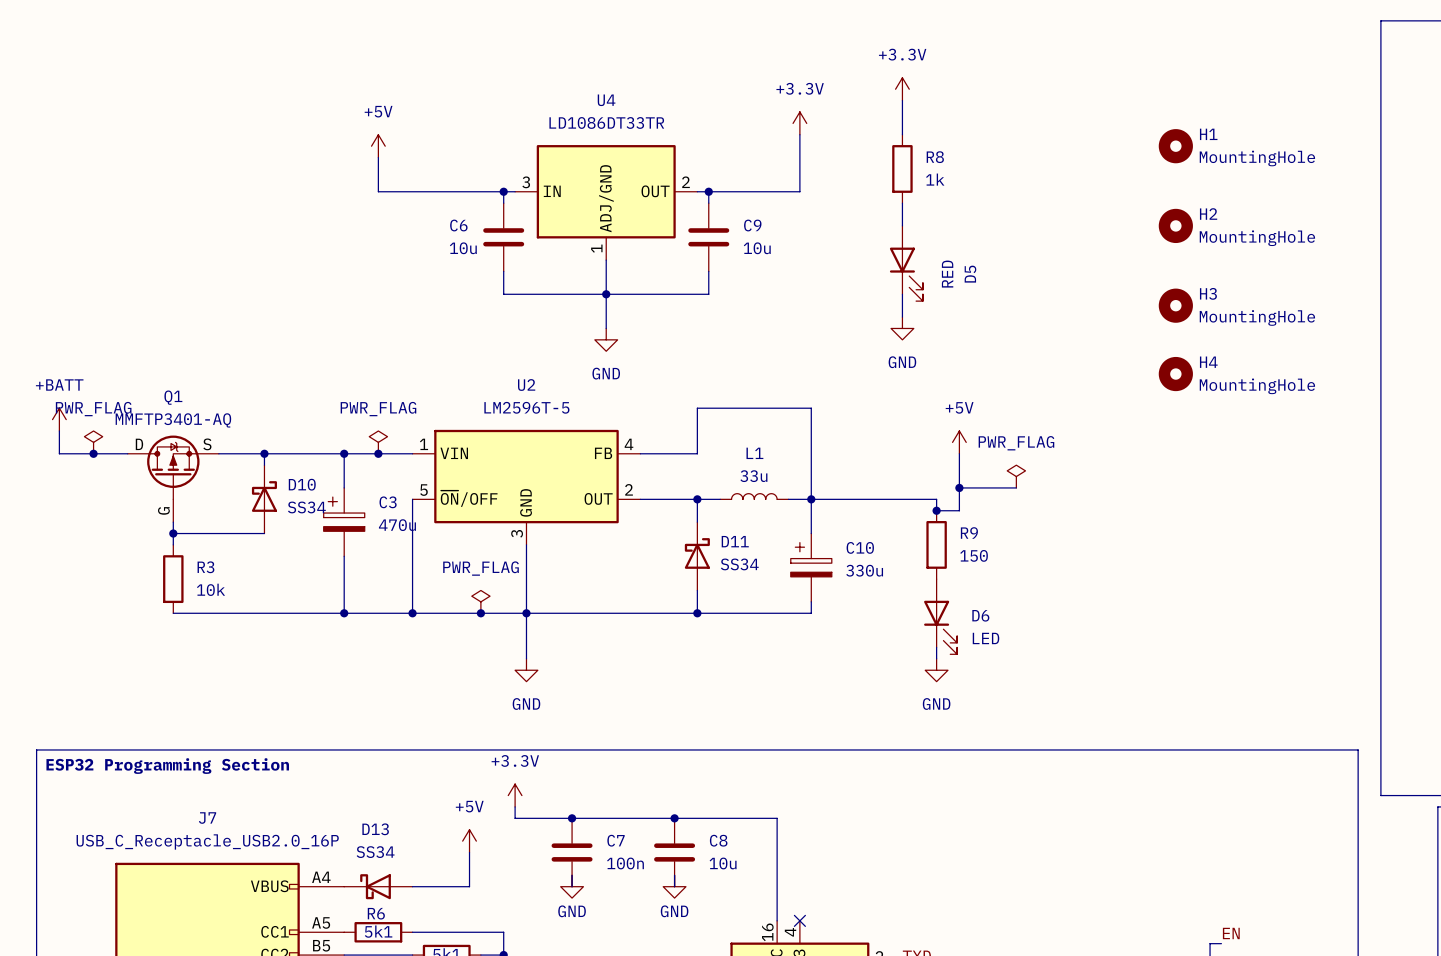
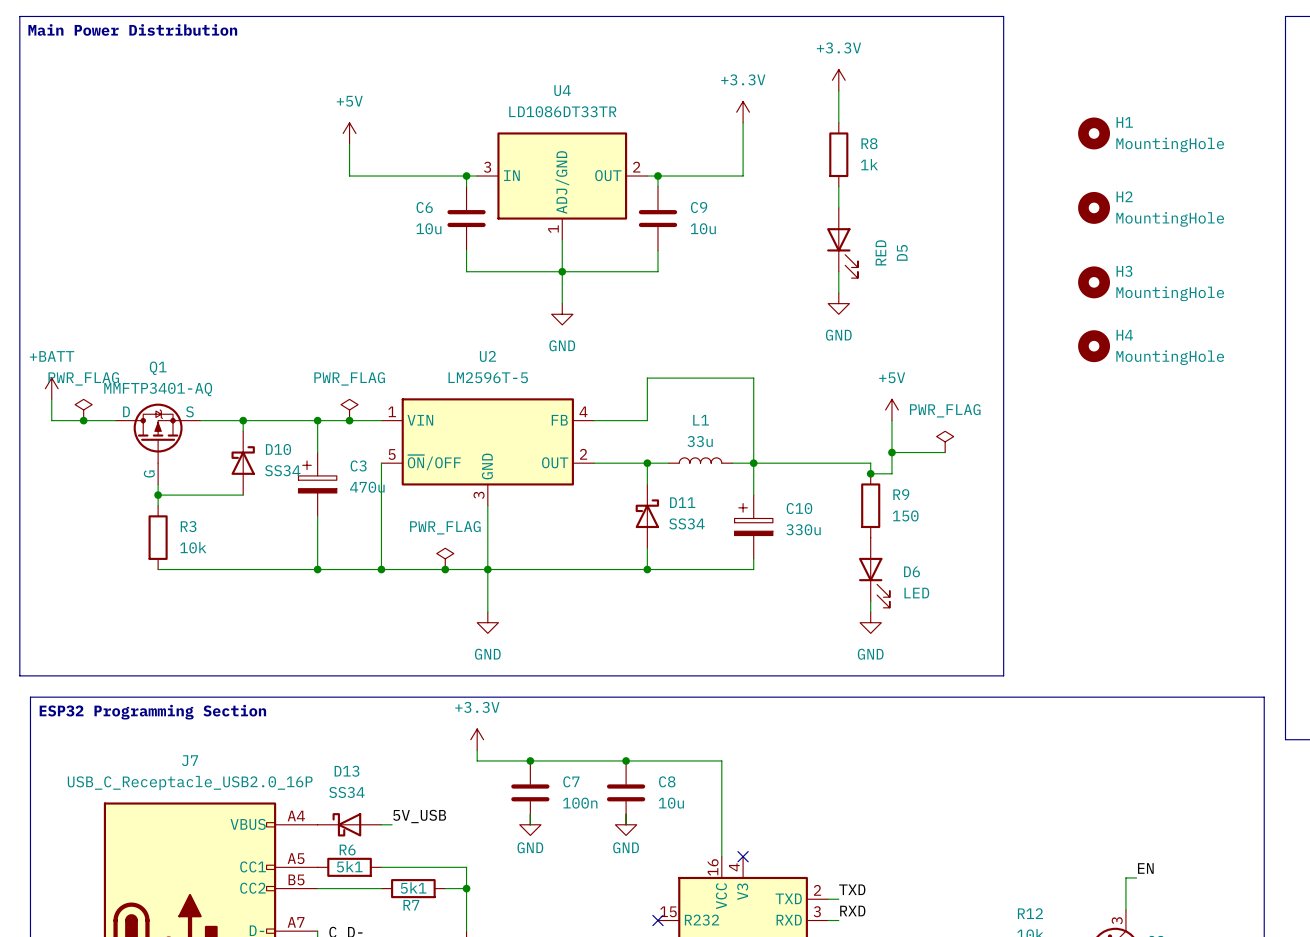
line: none -> (19, 16) (1003, 16) (1003, 675) (19, 675) (19, 16)
text: none -> Main Power Distribution (132, 29)
power symbol: +5V (469, 841) -> none
wire: (469, 852) (469, 886) (423, 886) -> none
label: none -> 5V_USB (419, 816)

